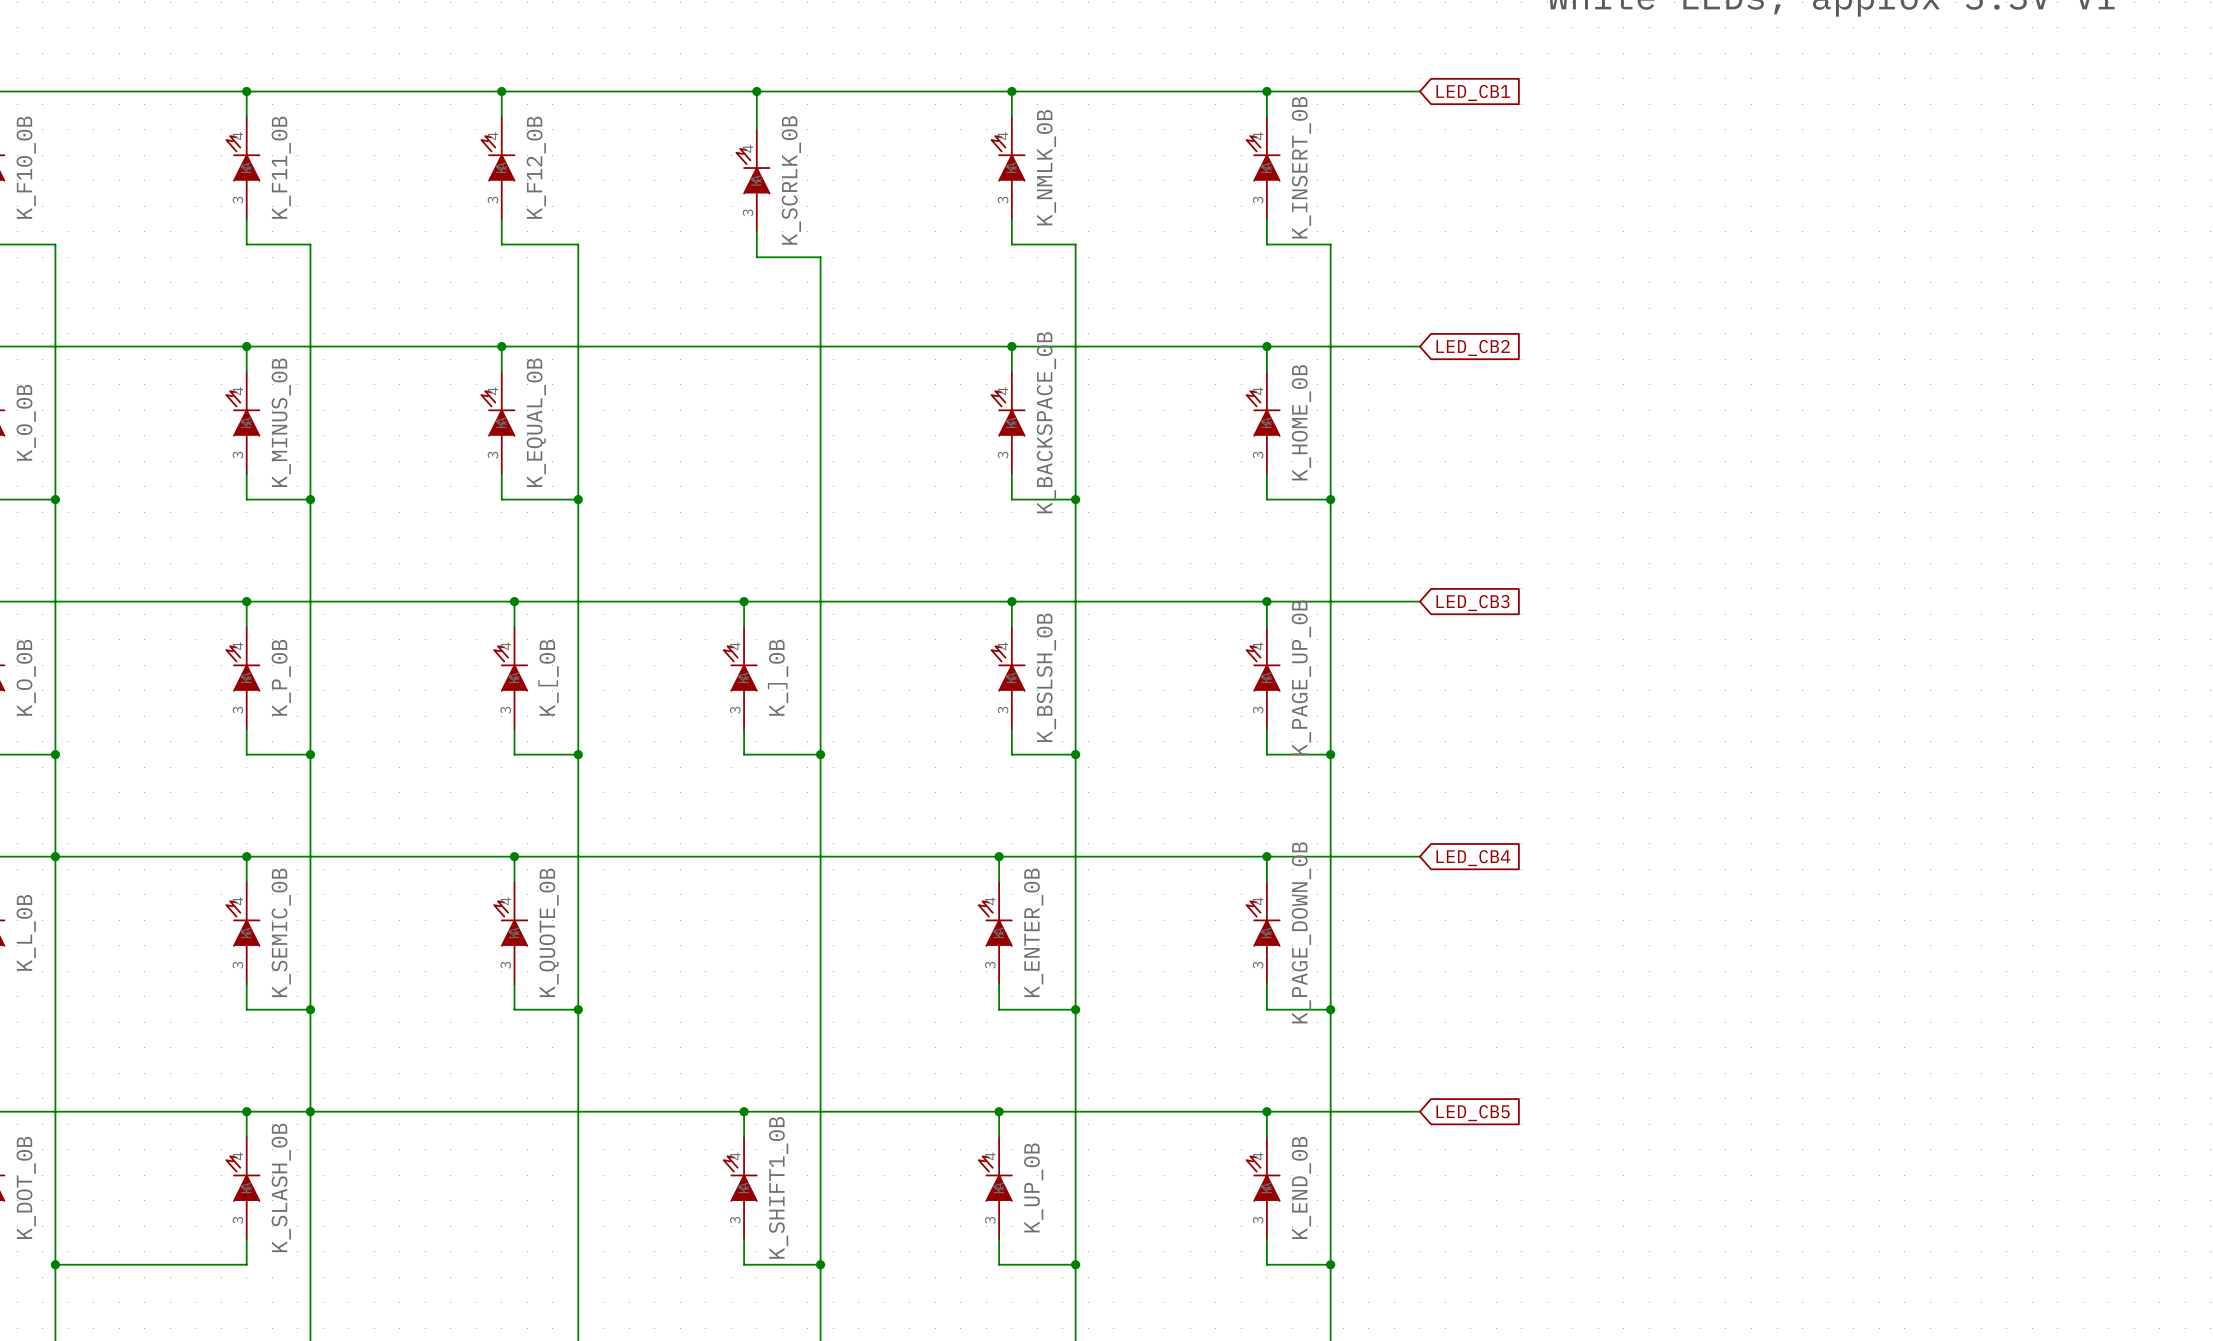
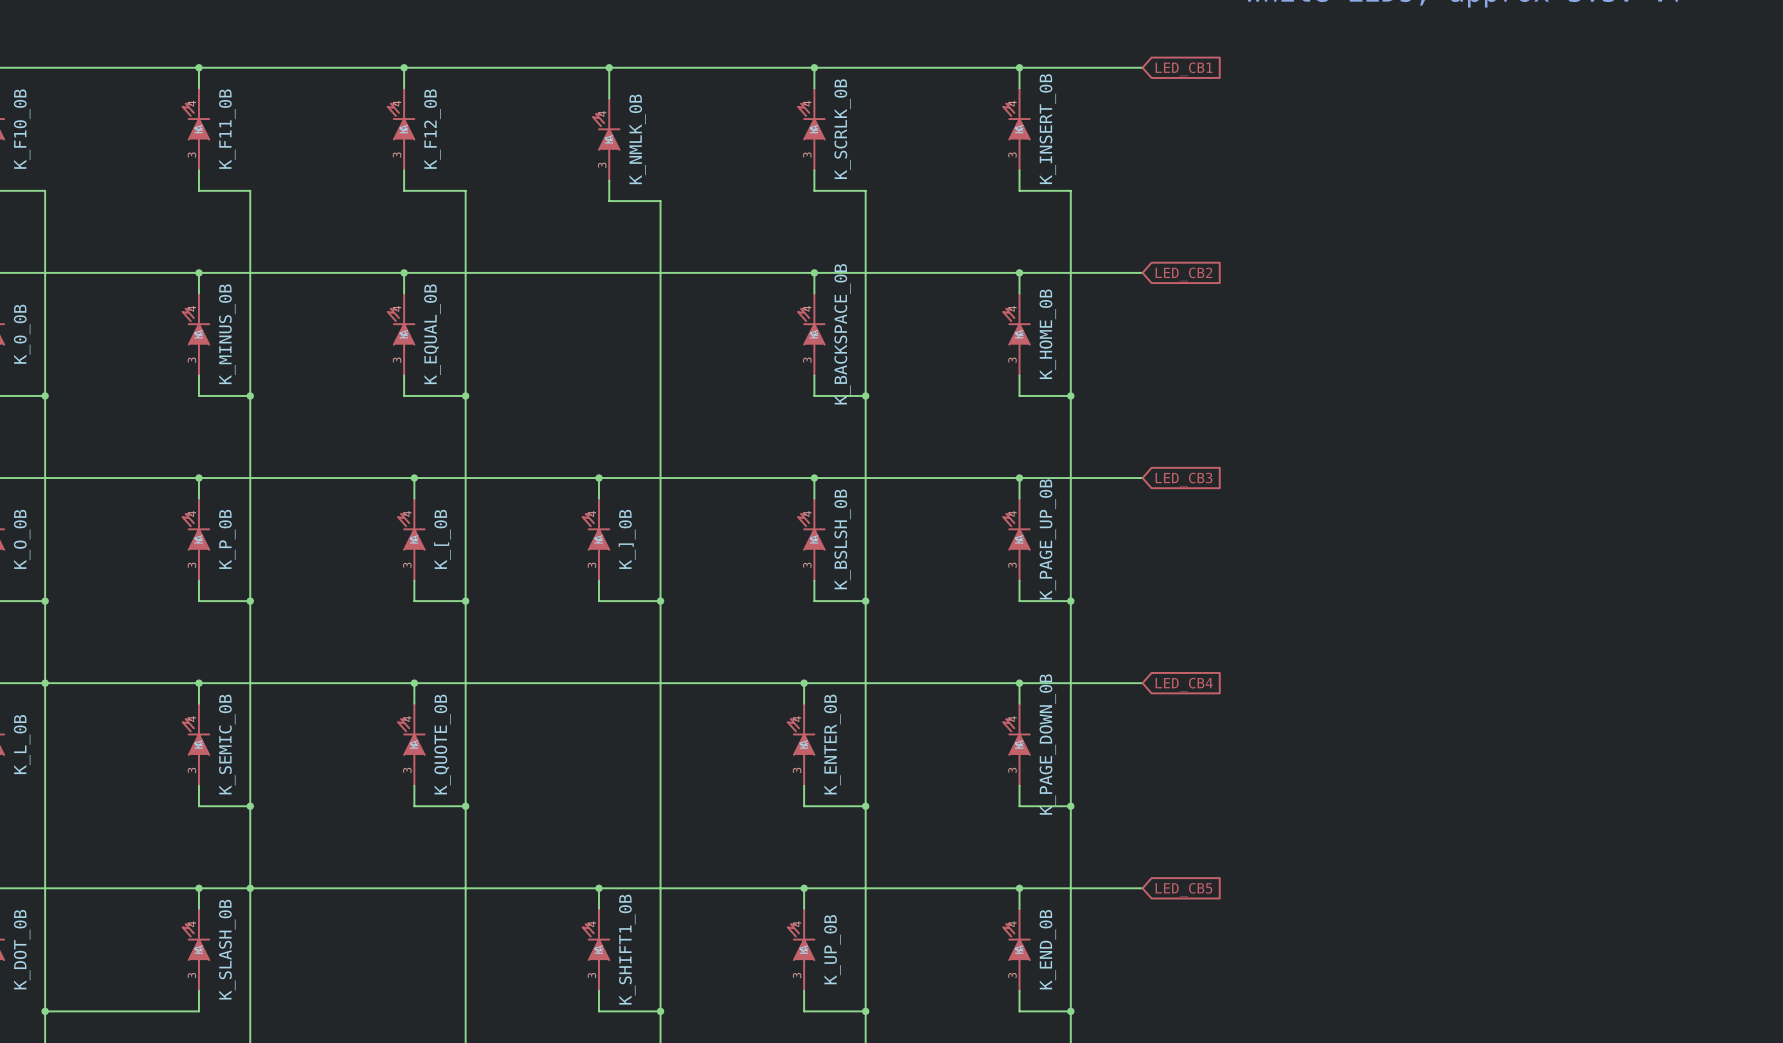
K_NMLK_0B name: K_NMLK_0B (1046, 167) -> K_SCRLK_0B (842, 129)
K_SCRLK_0B name: K_SCRLK_0B (791, 180) -> K_NMLK_0B (637, 139)

